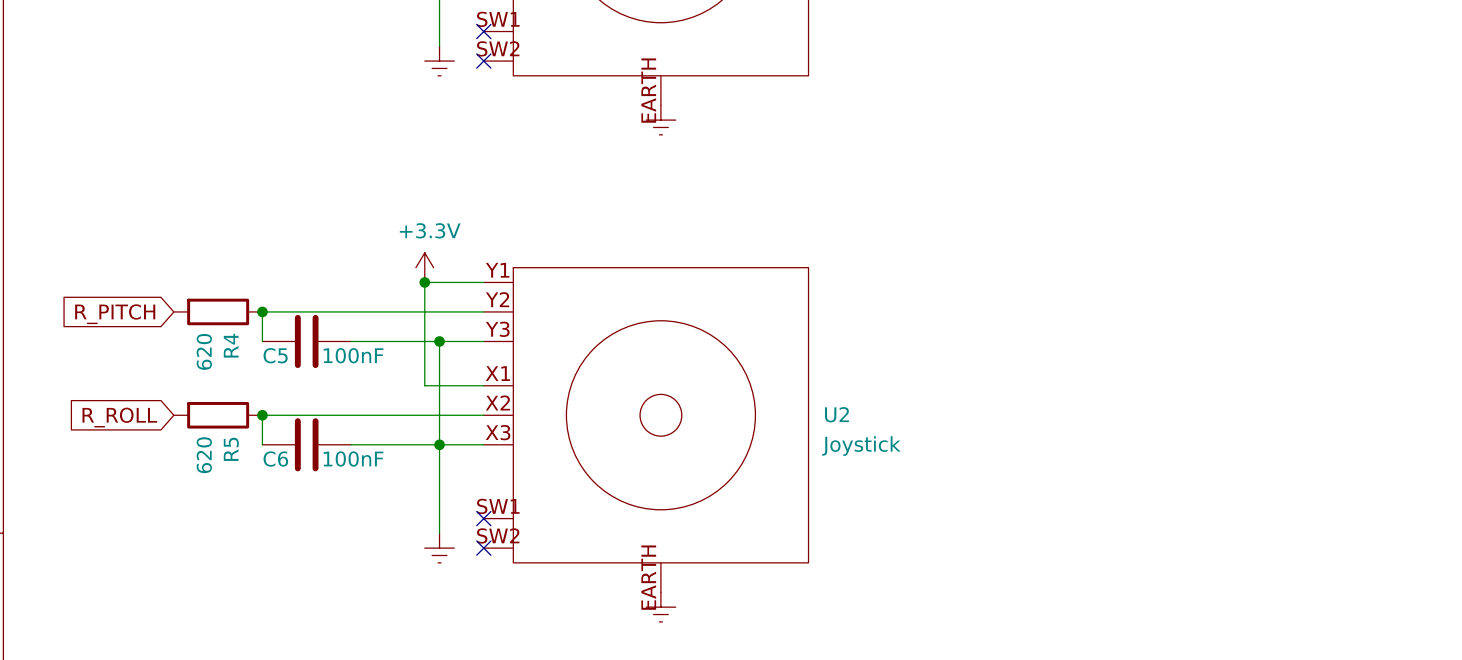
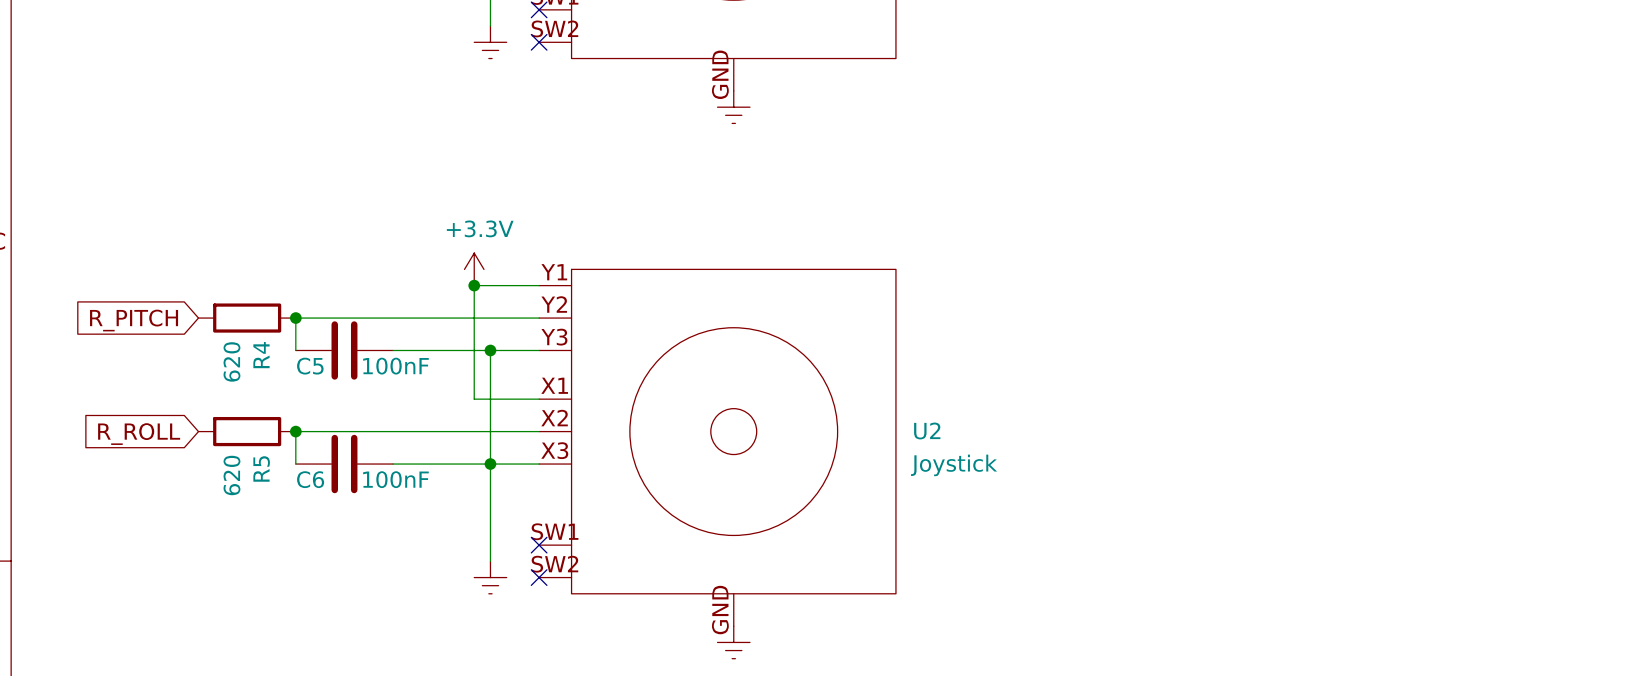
part pin number: EARTH (648, 90) -> GND (720, 74)
U2 pin number: EARTH (648, 577) -> GND (720, 610)

